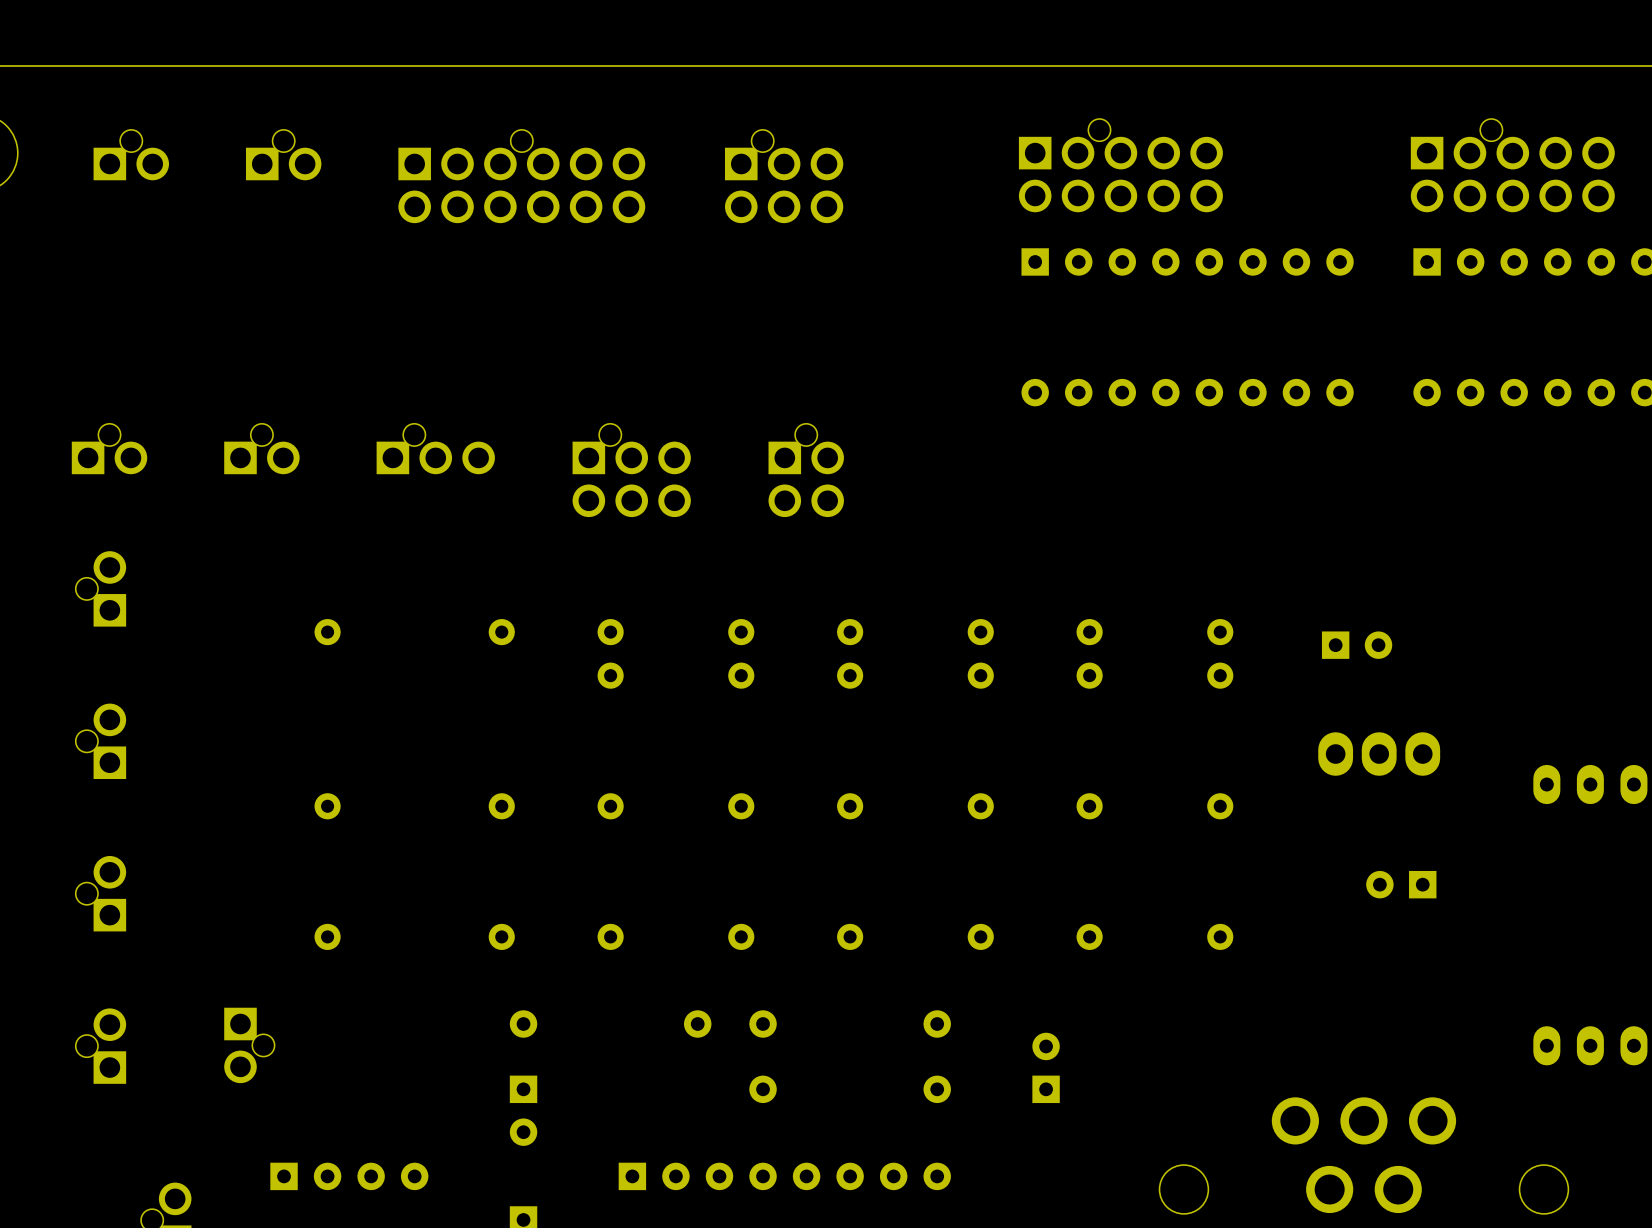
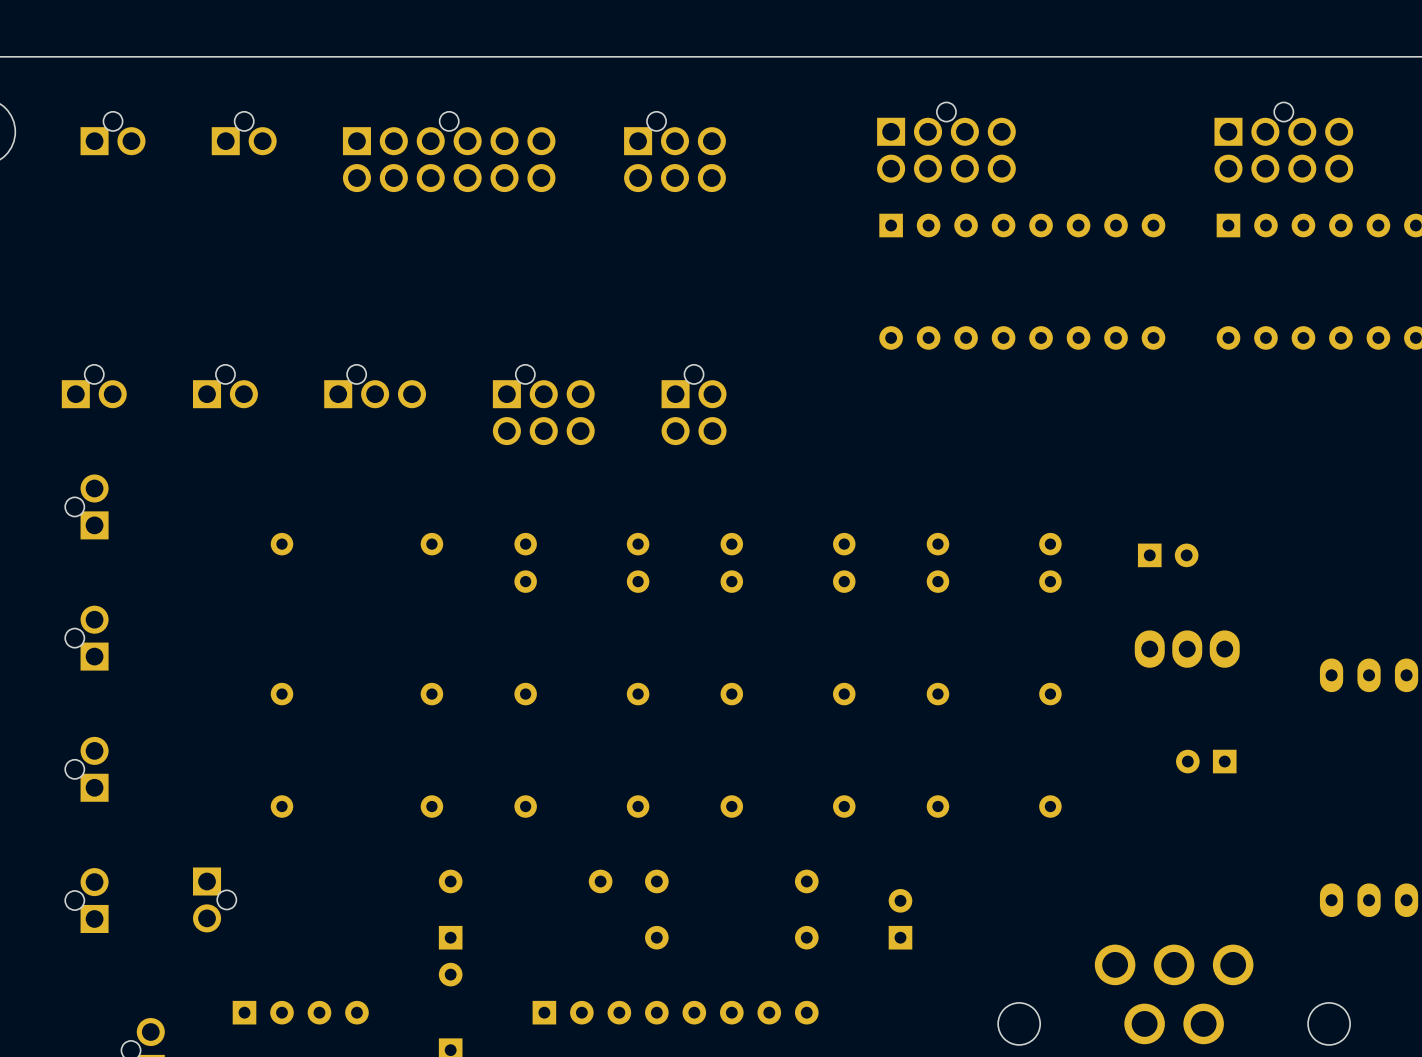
part: (1120, 165) -> none
part: (1512, 165) -> none

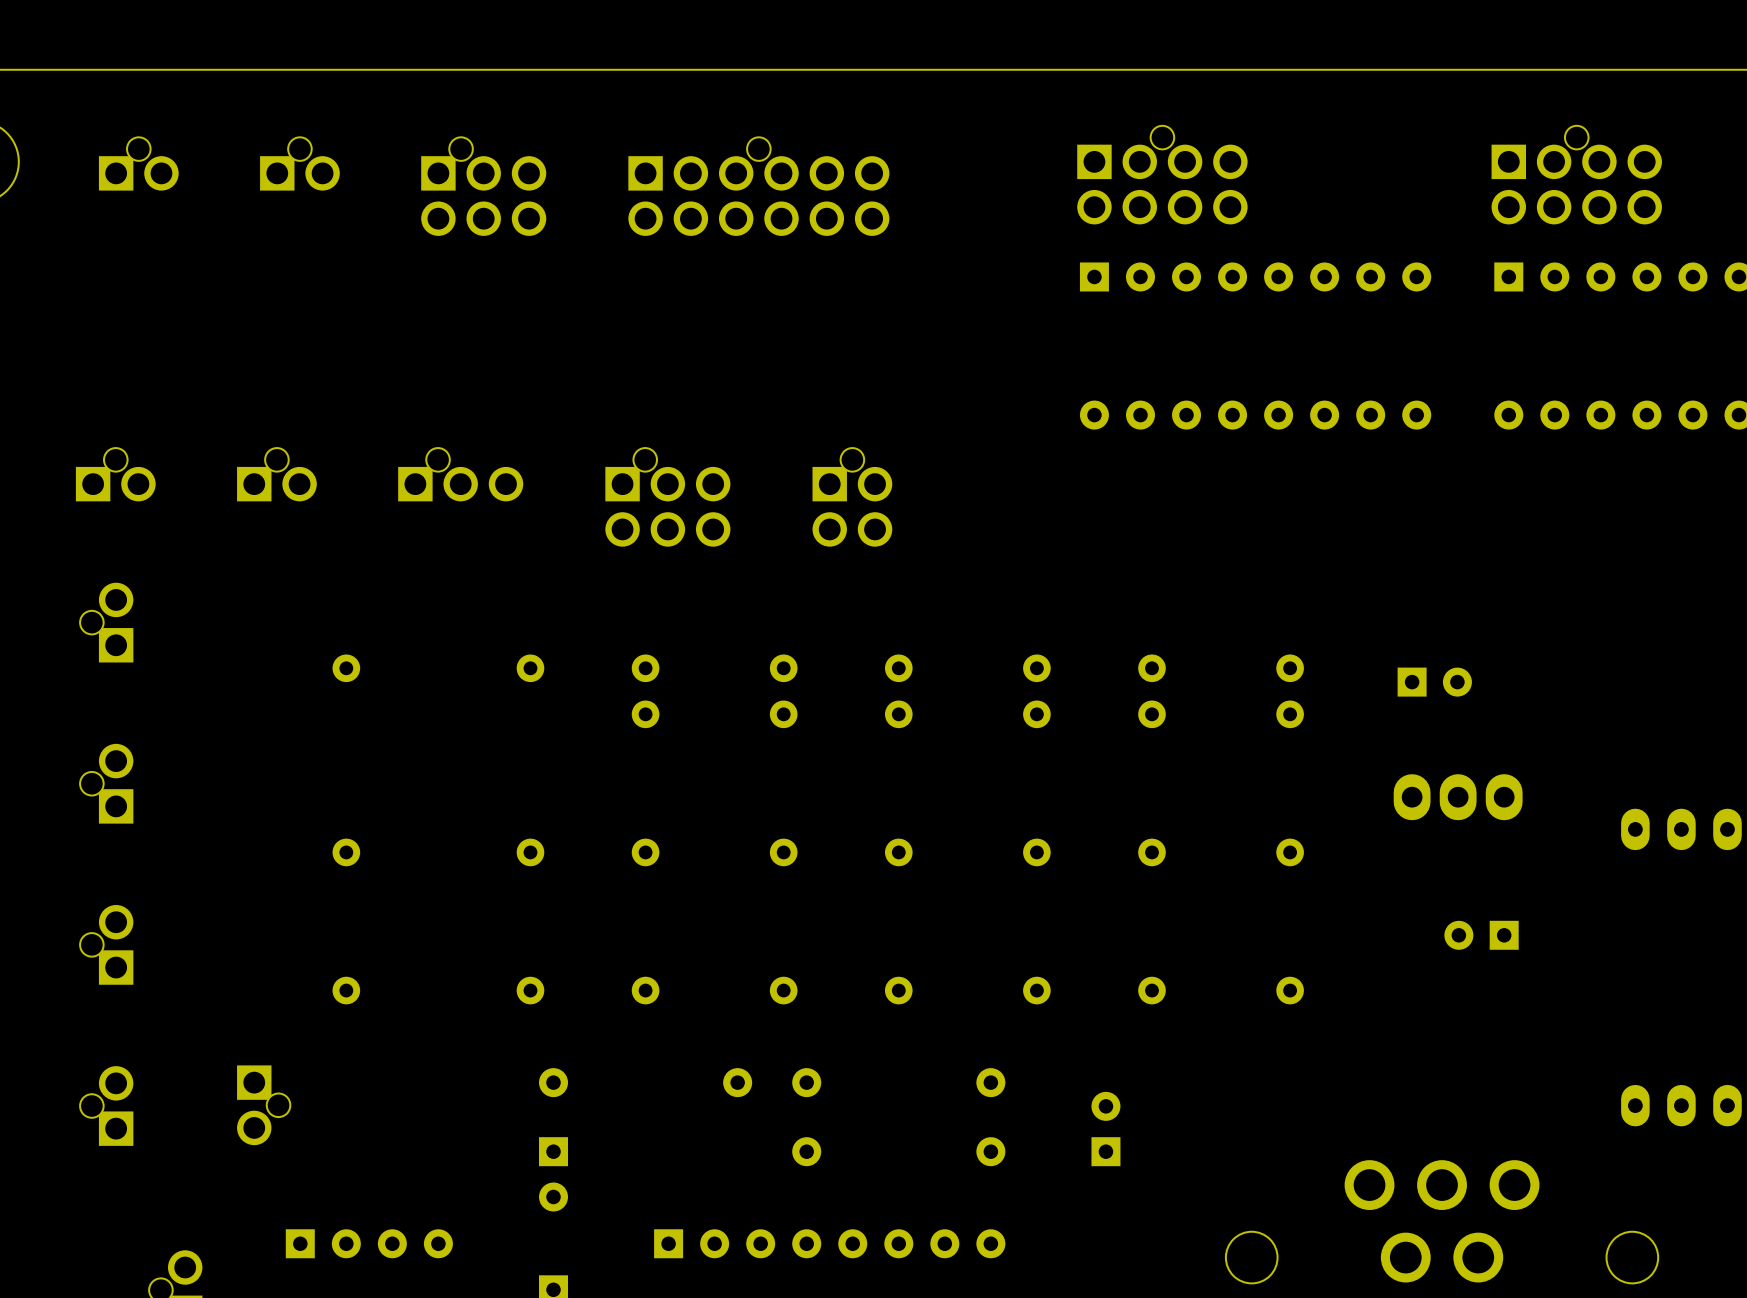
part position: (449, 151) -> (758, 186)
part position: (674, 151) -> (483, 186)

